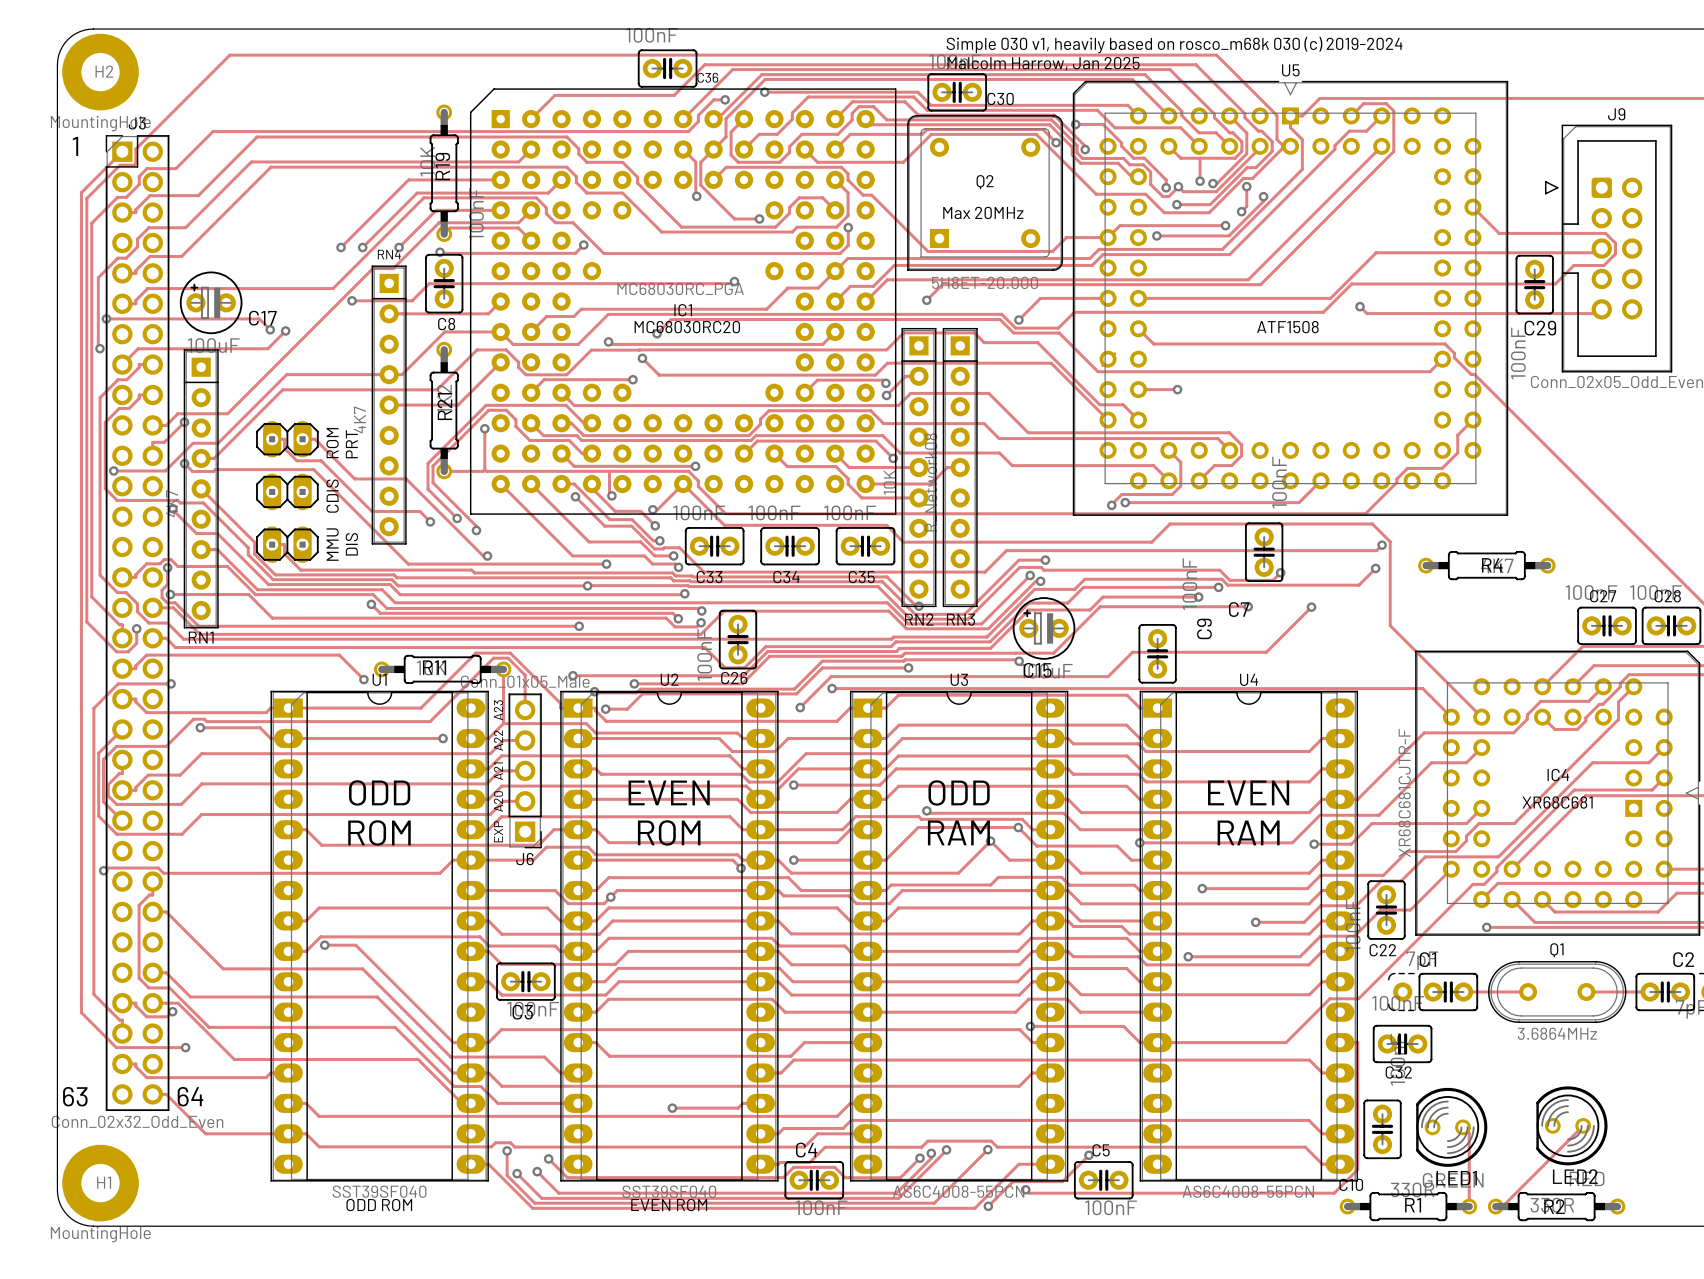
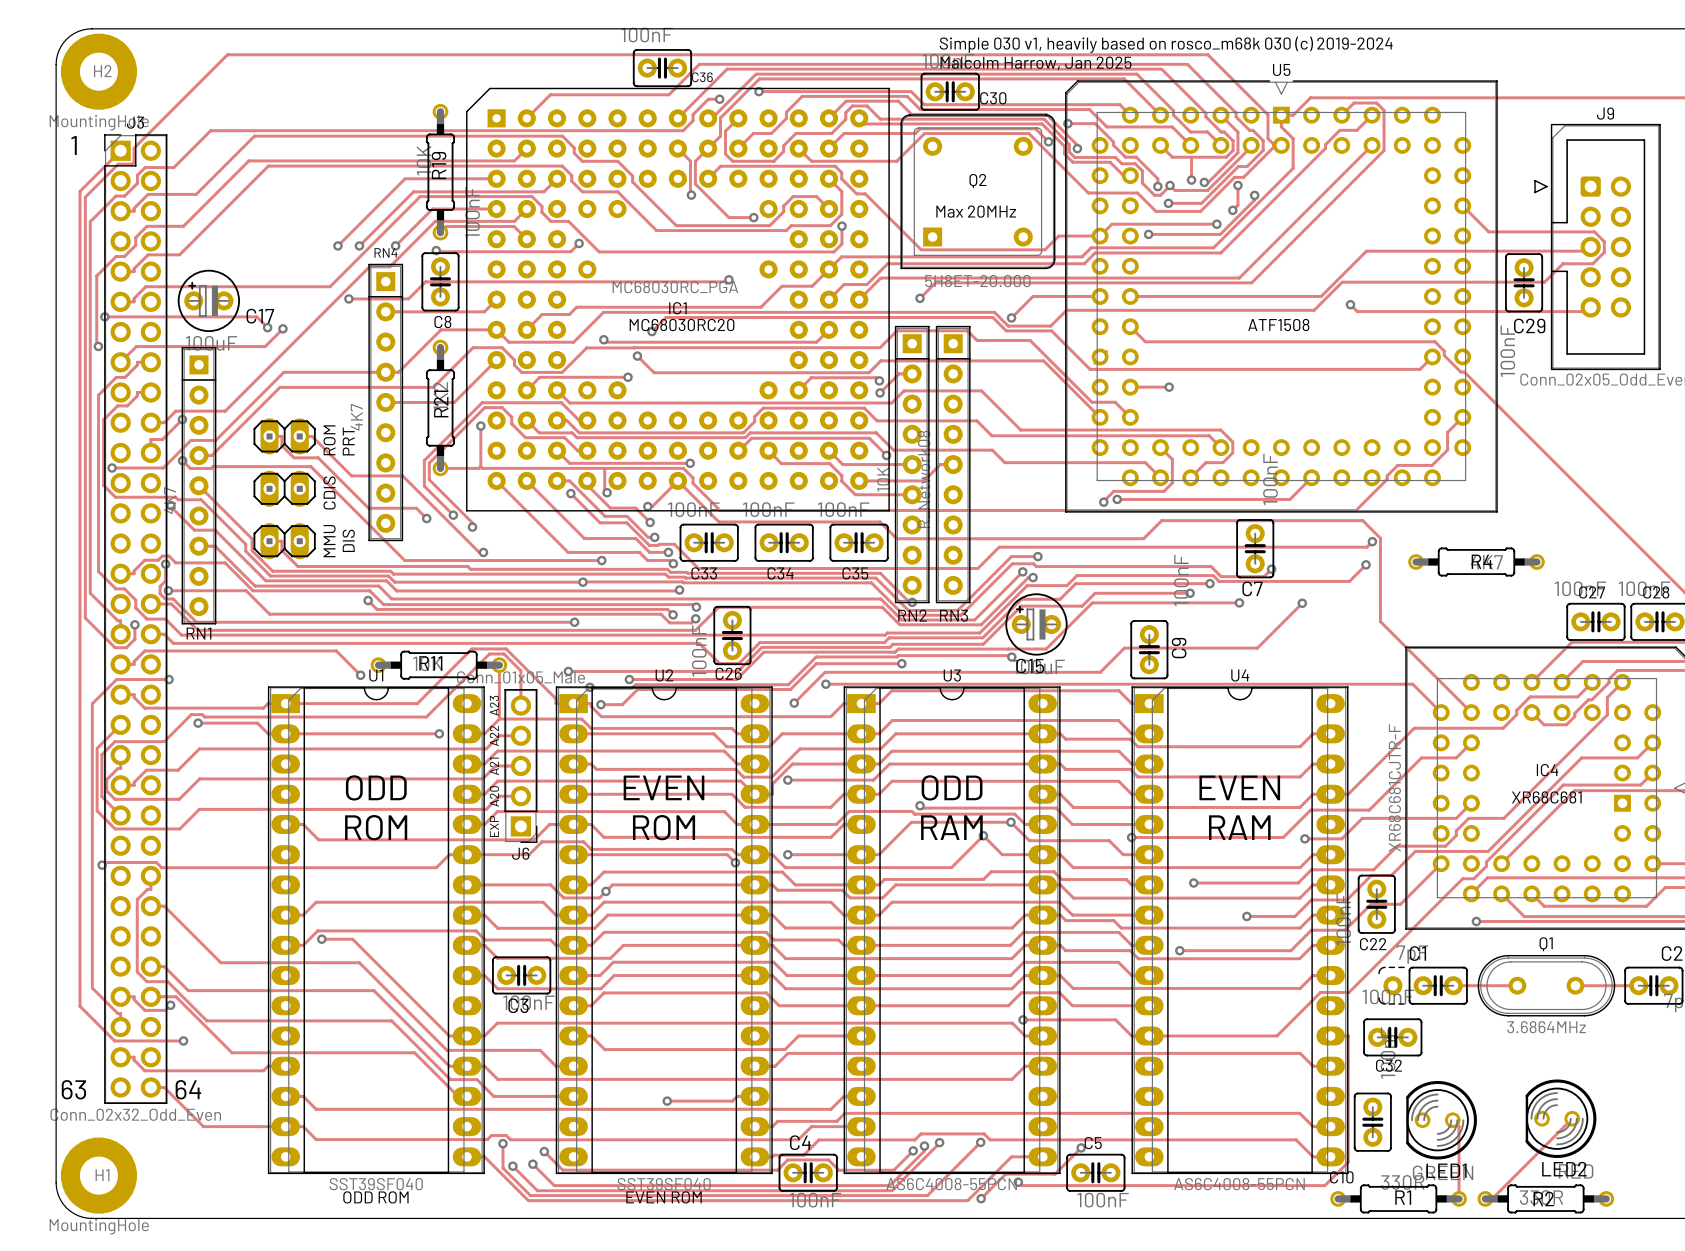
C7 name position: C7 (1239, 609) -> C7 (1252, 588)
C9 name position: C9 (1204, 628) -> C9 (1179, 648)

